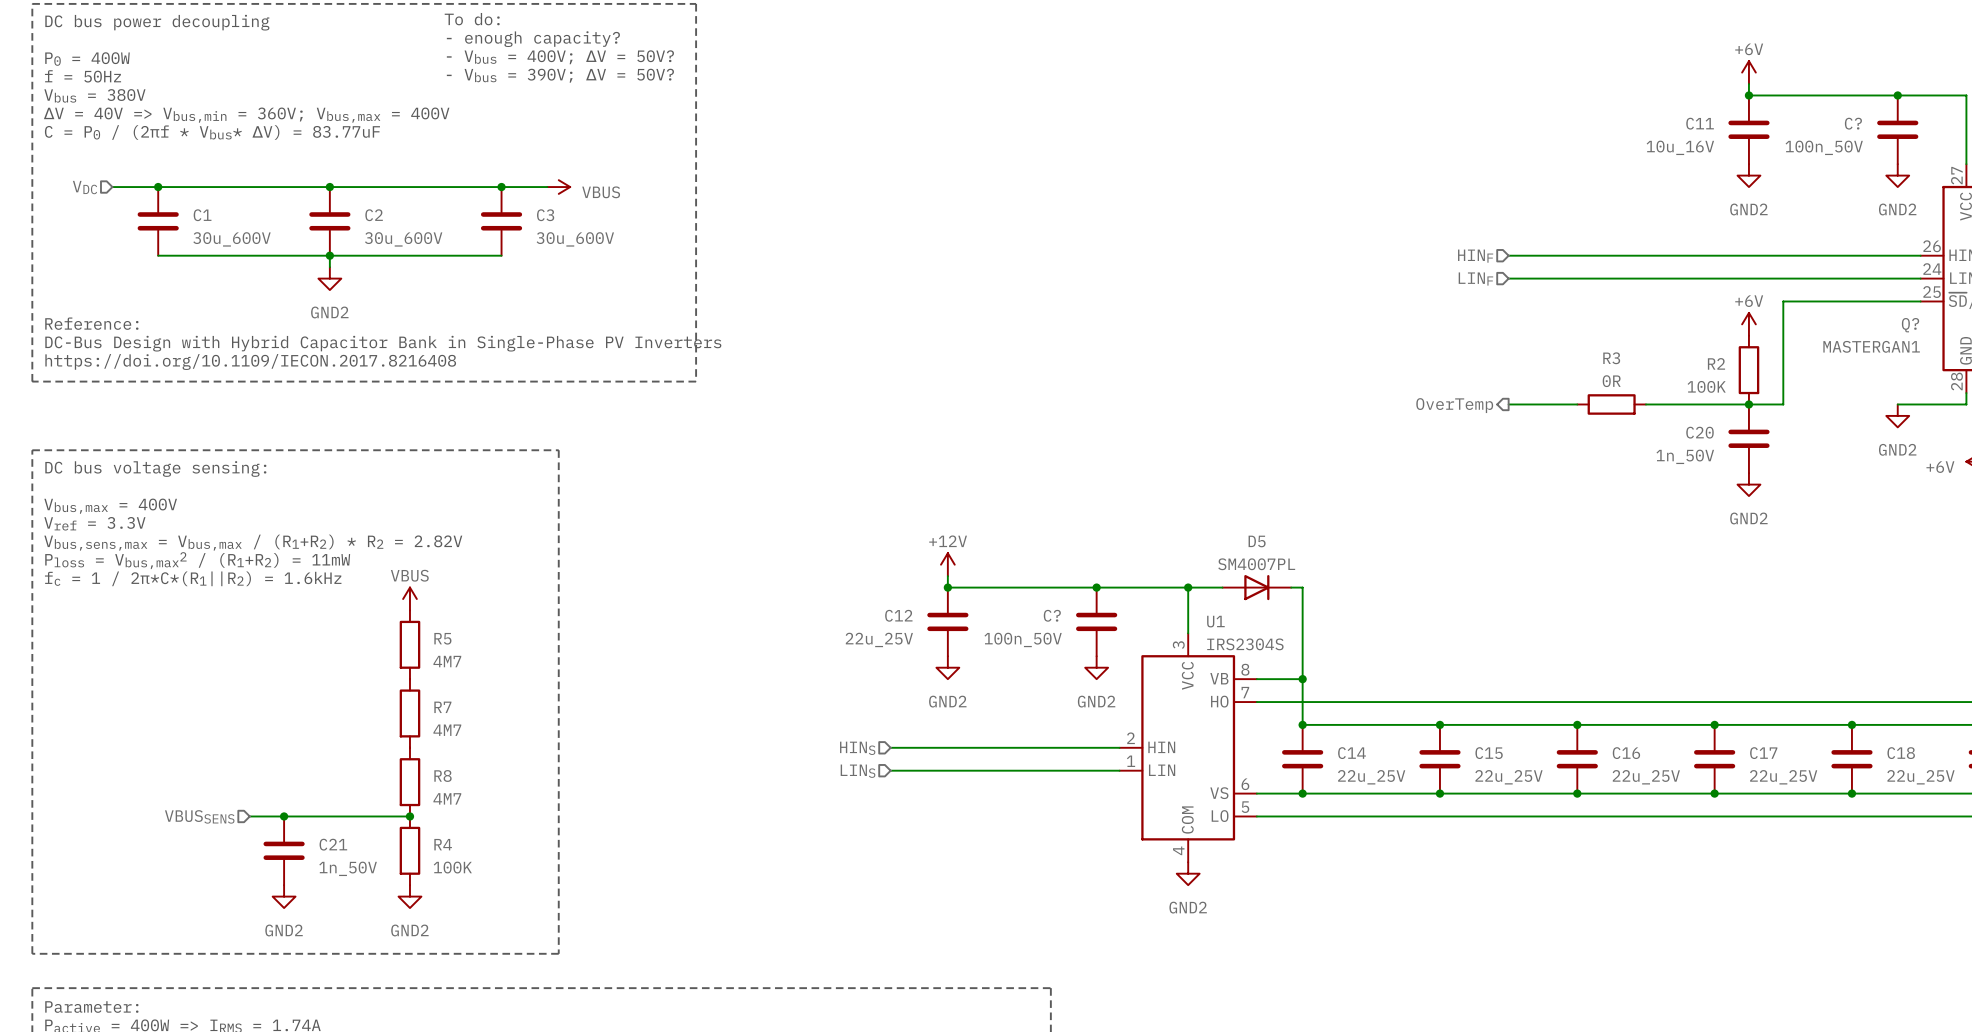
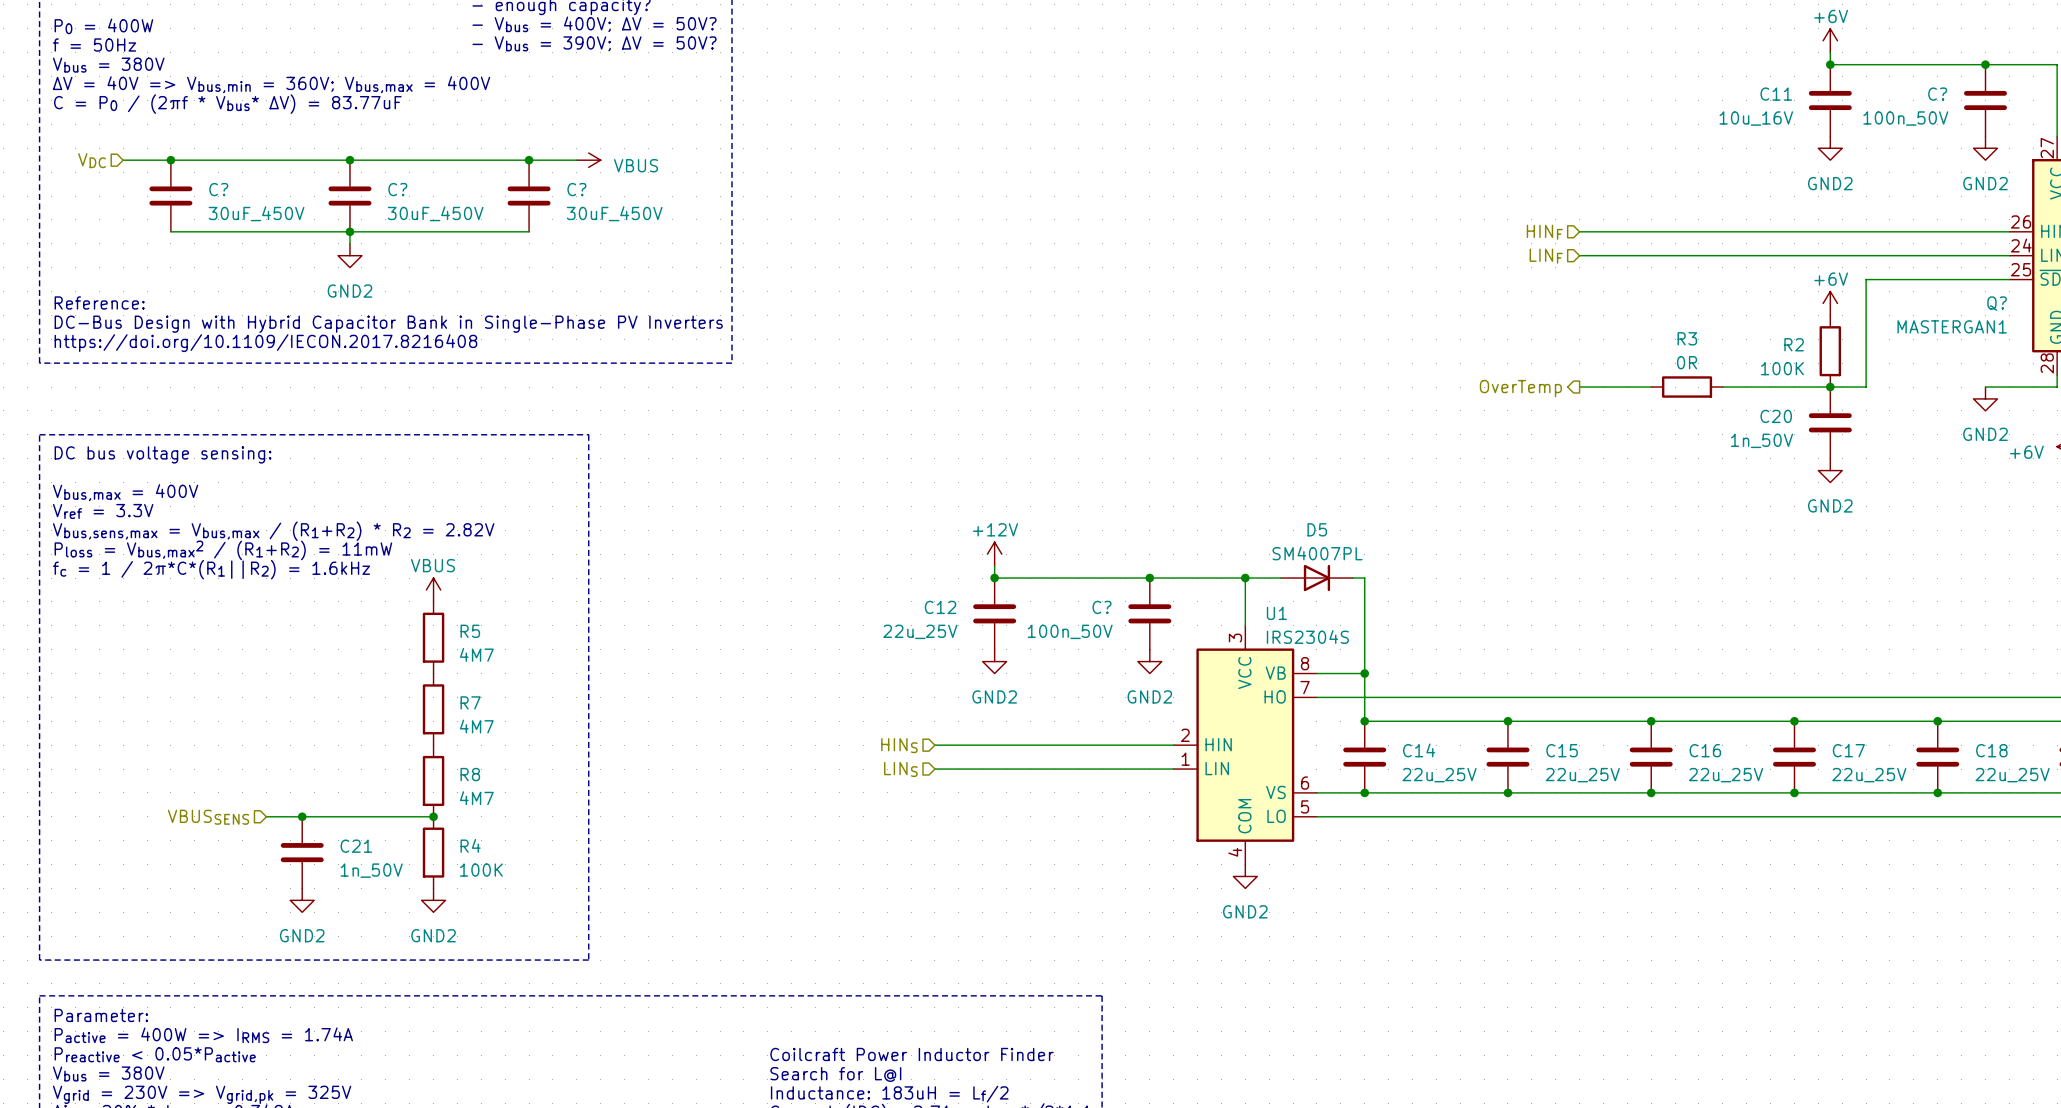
C1 name: C1 (202, 215) -> C? (218, 189)
C2 name: C2 (374, 215) -> C? (397, 189)
C3 name: C3 (545, 215) -> C? (576, 189)
C1 value: 30u_600V (231, 239) -> 30uF_450V (256, 213)
C2 value: 30u_600V (403, 239) -> 30uF_450V (435, 213)
C3 value: 30u_600V (575, 239) -> 30uF_450V (614, 213)

